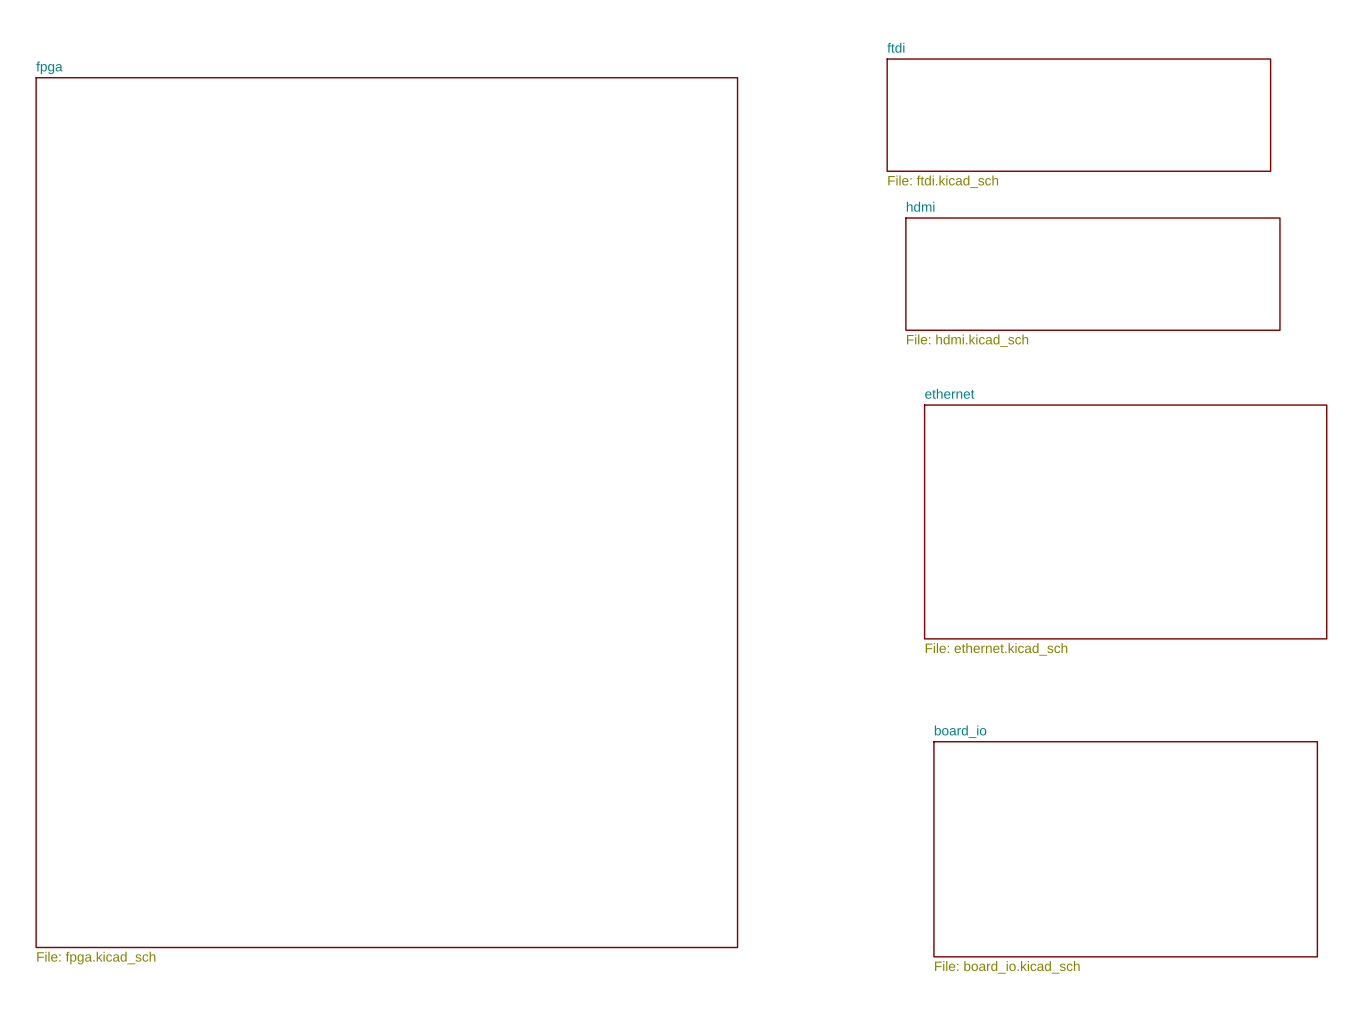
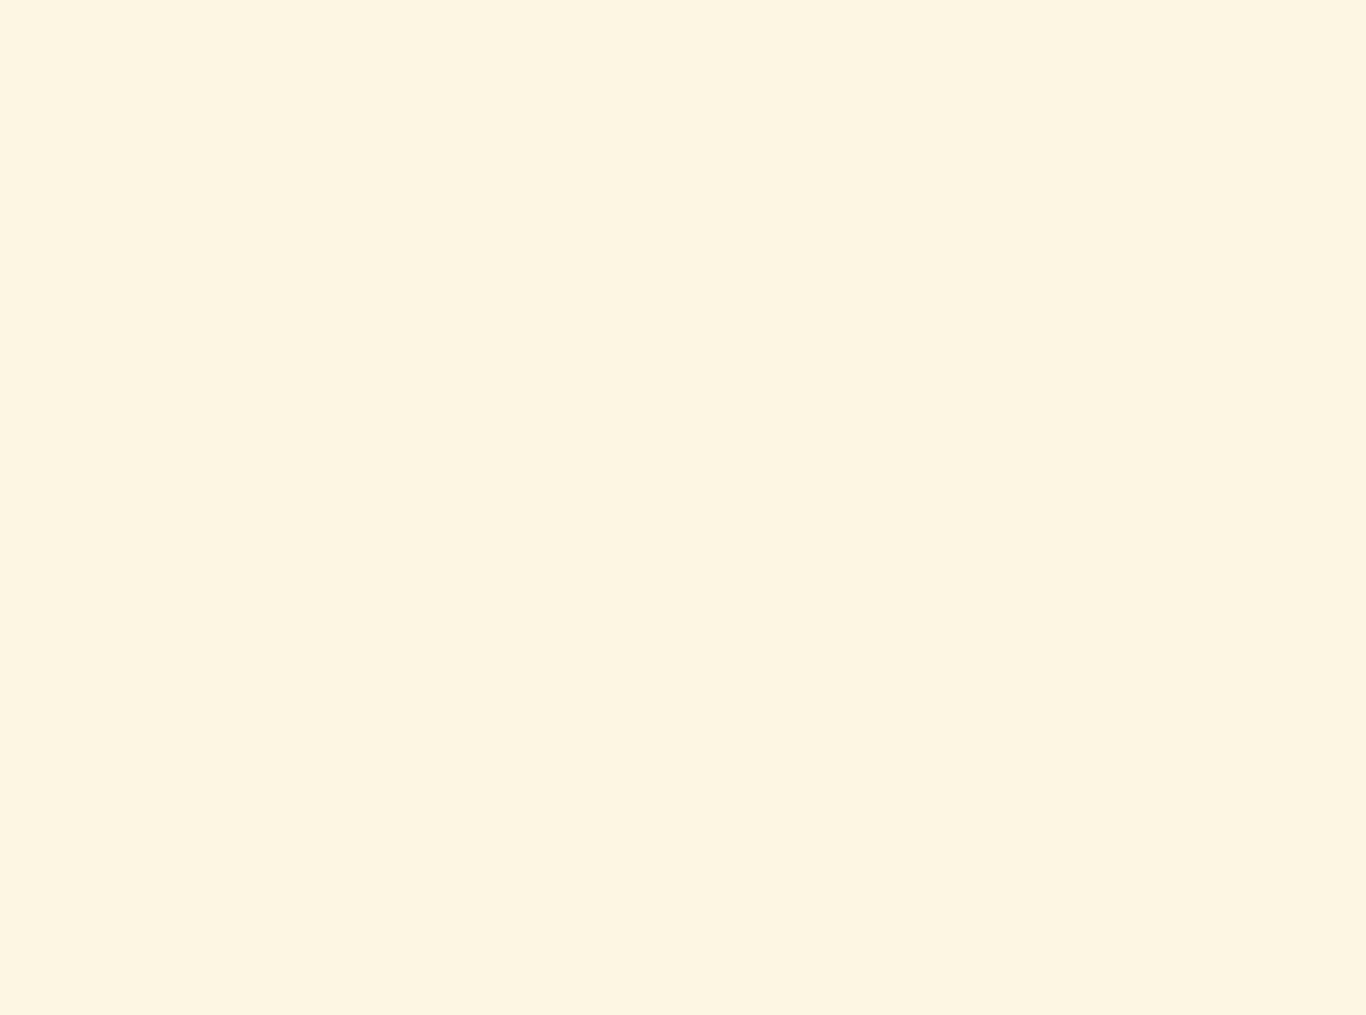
sheet ftdi: File: ftdi.kicad_sch (1078, 115) -> none
sheet hdmi: File: hdmi.kicad_sch (1092, 274) -> none
sheet fpga: File: fpga.kicad_sch (386, 512) -> none
sheet ethernet: File: ethernet.kicad_sch (1125, 521) -> none
sheet board_io: File: board_io.kicad_sch (1125, 849) -> none

